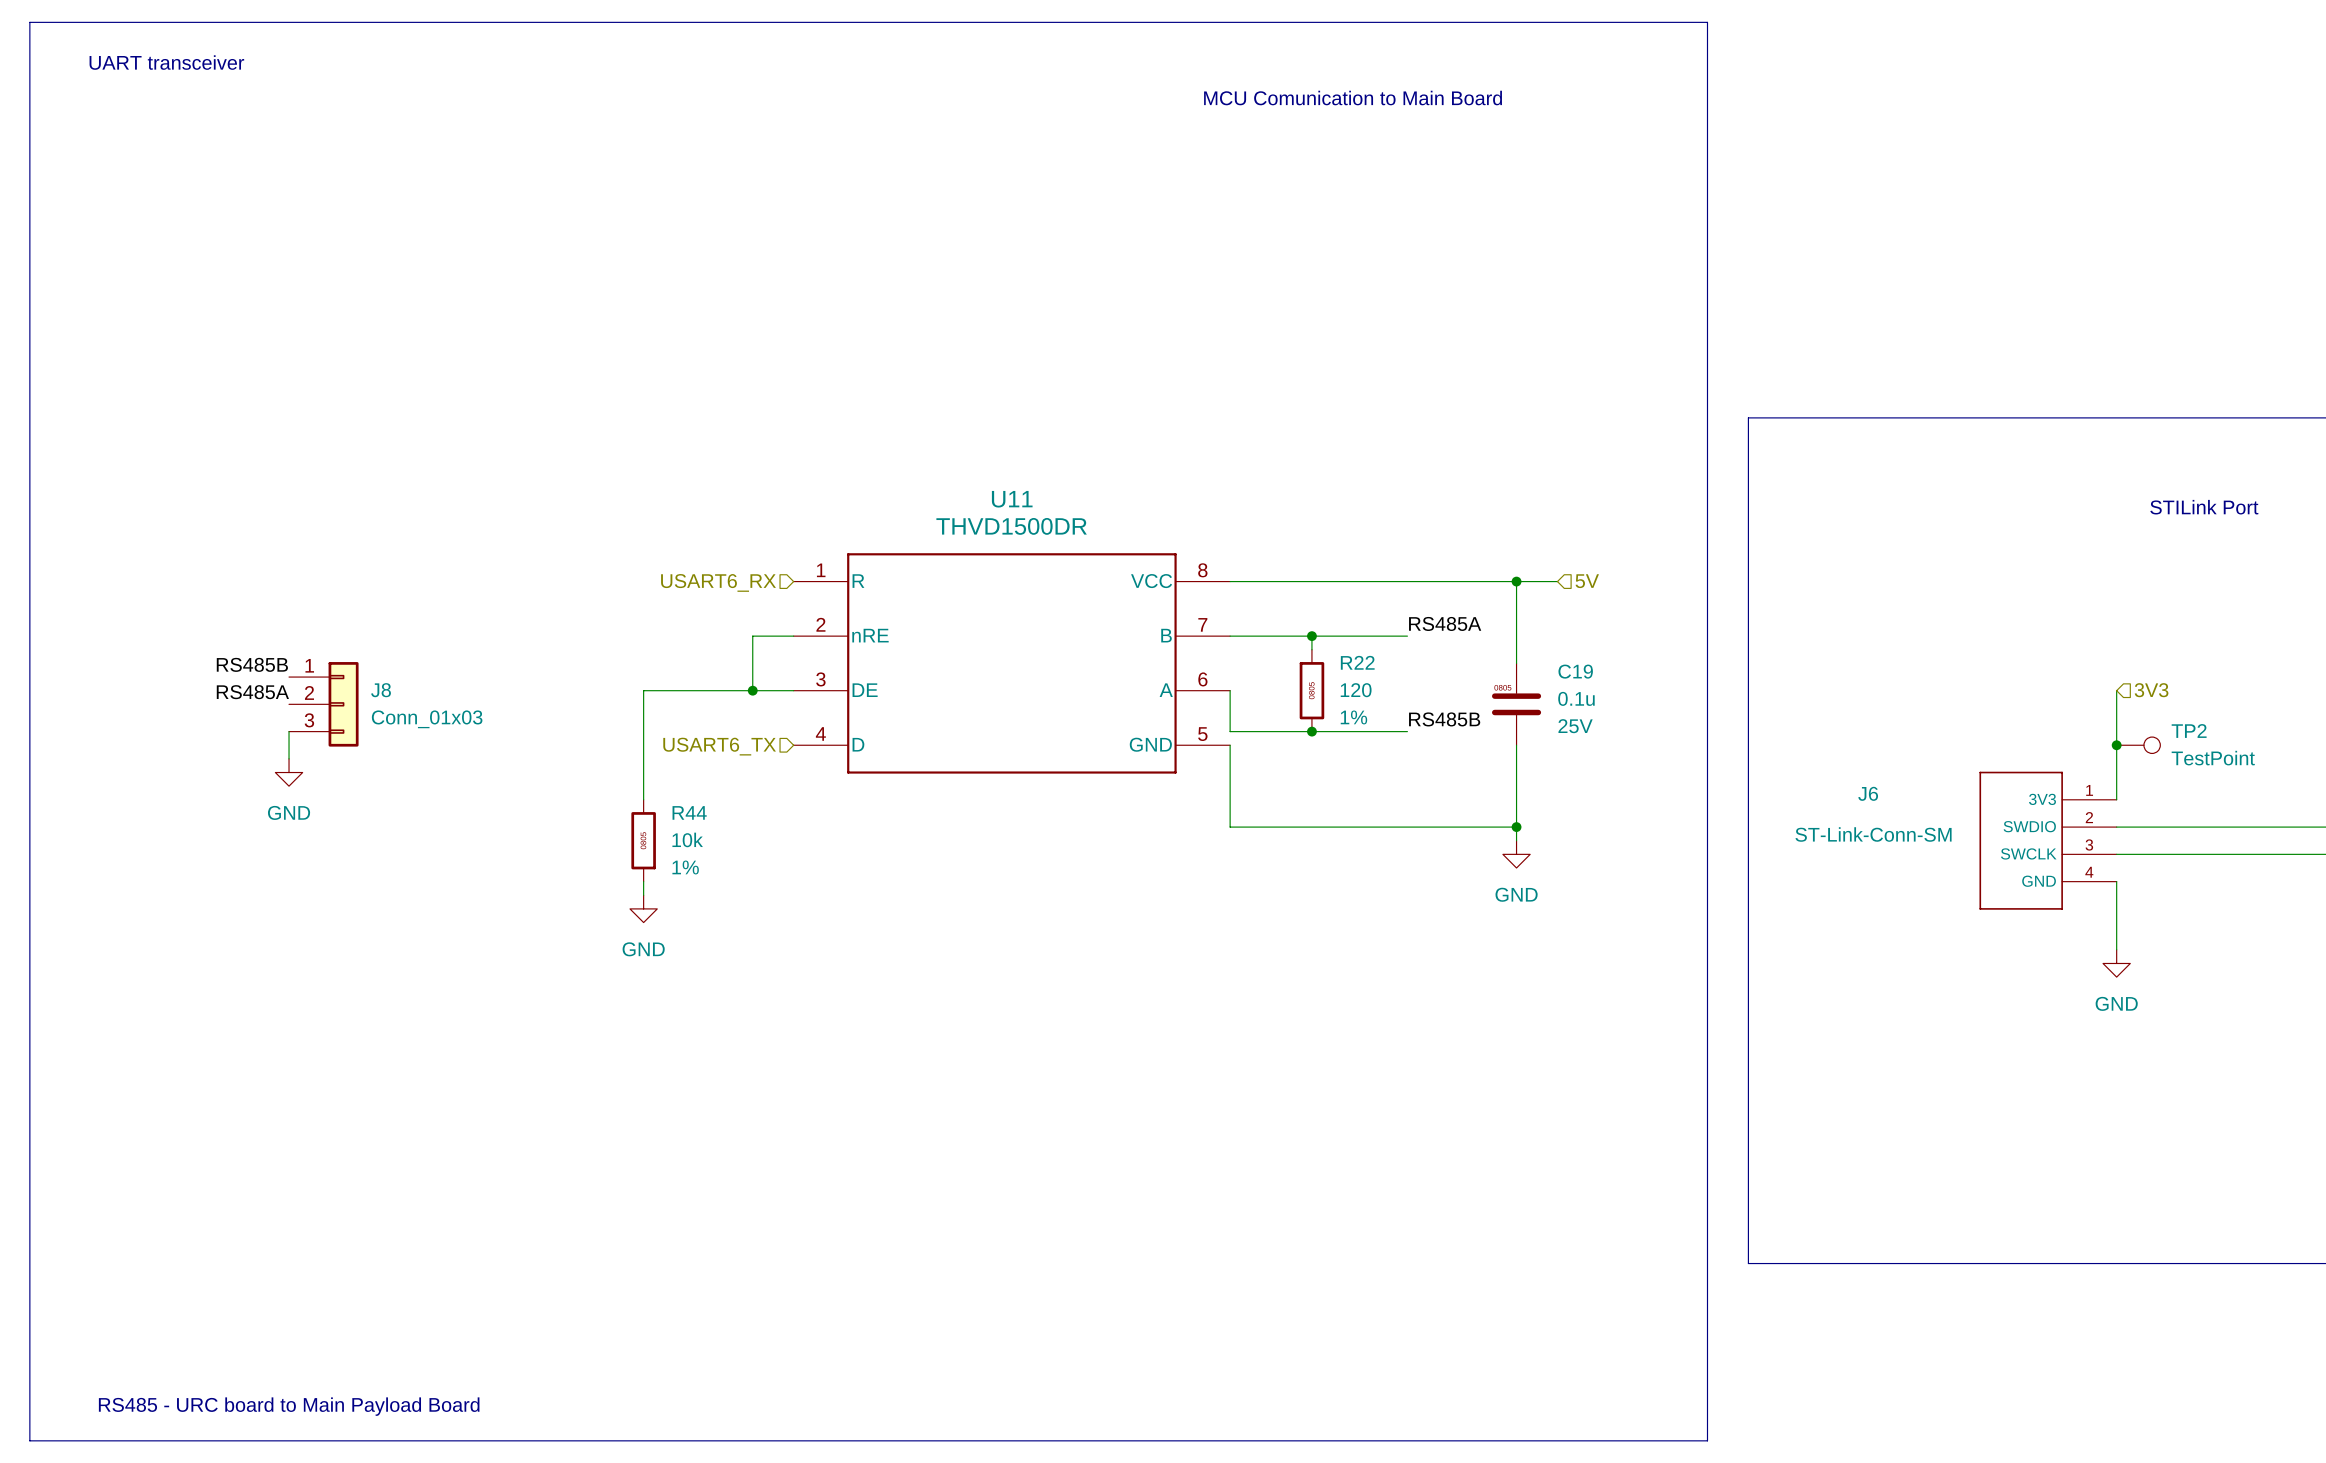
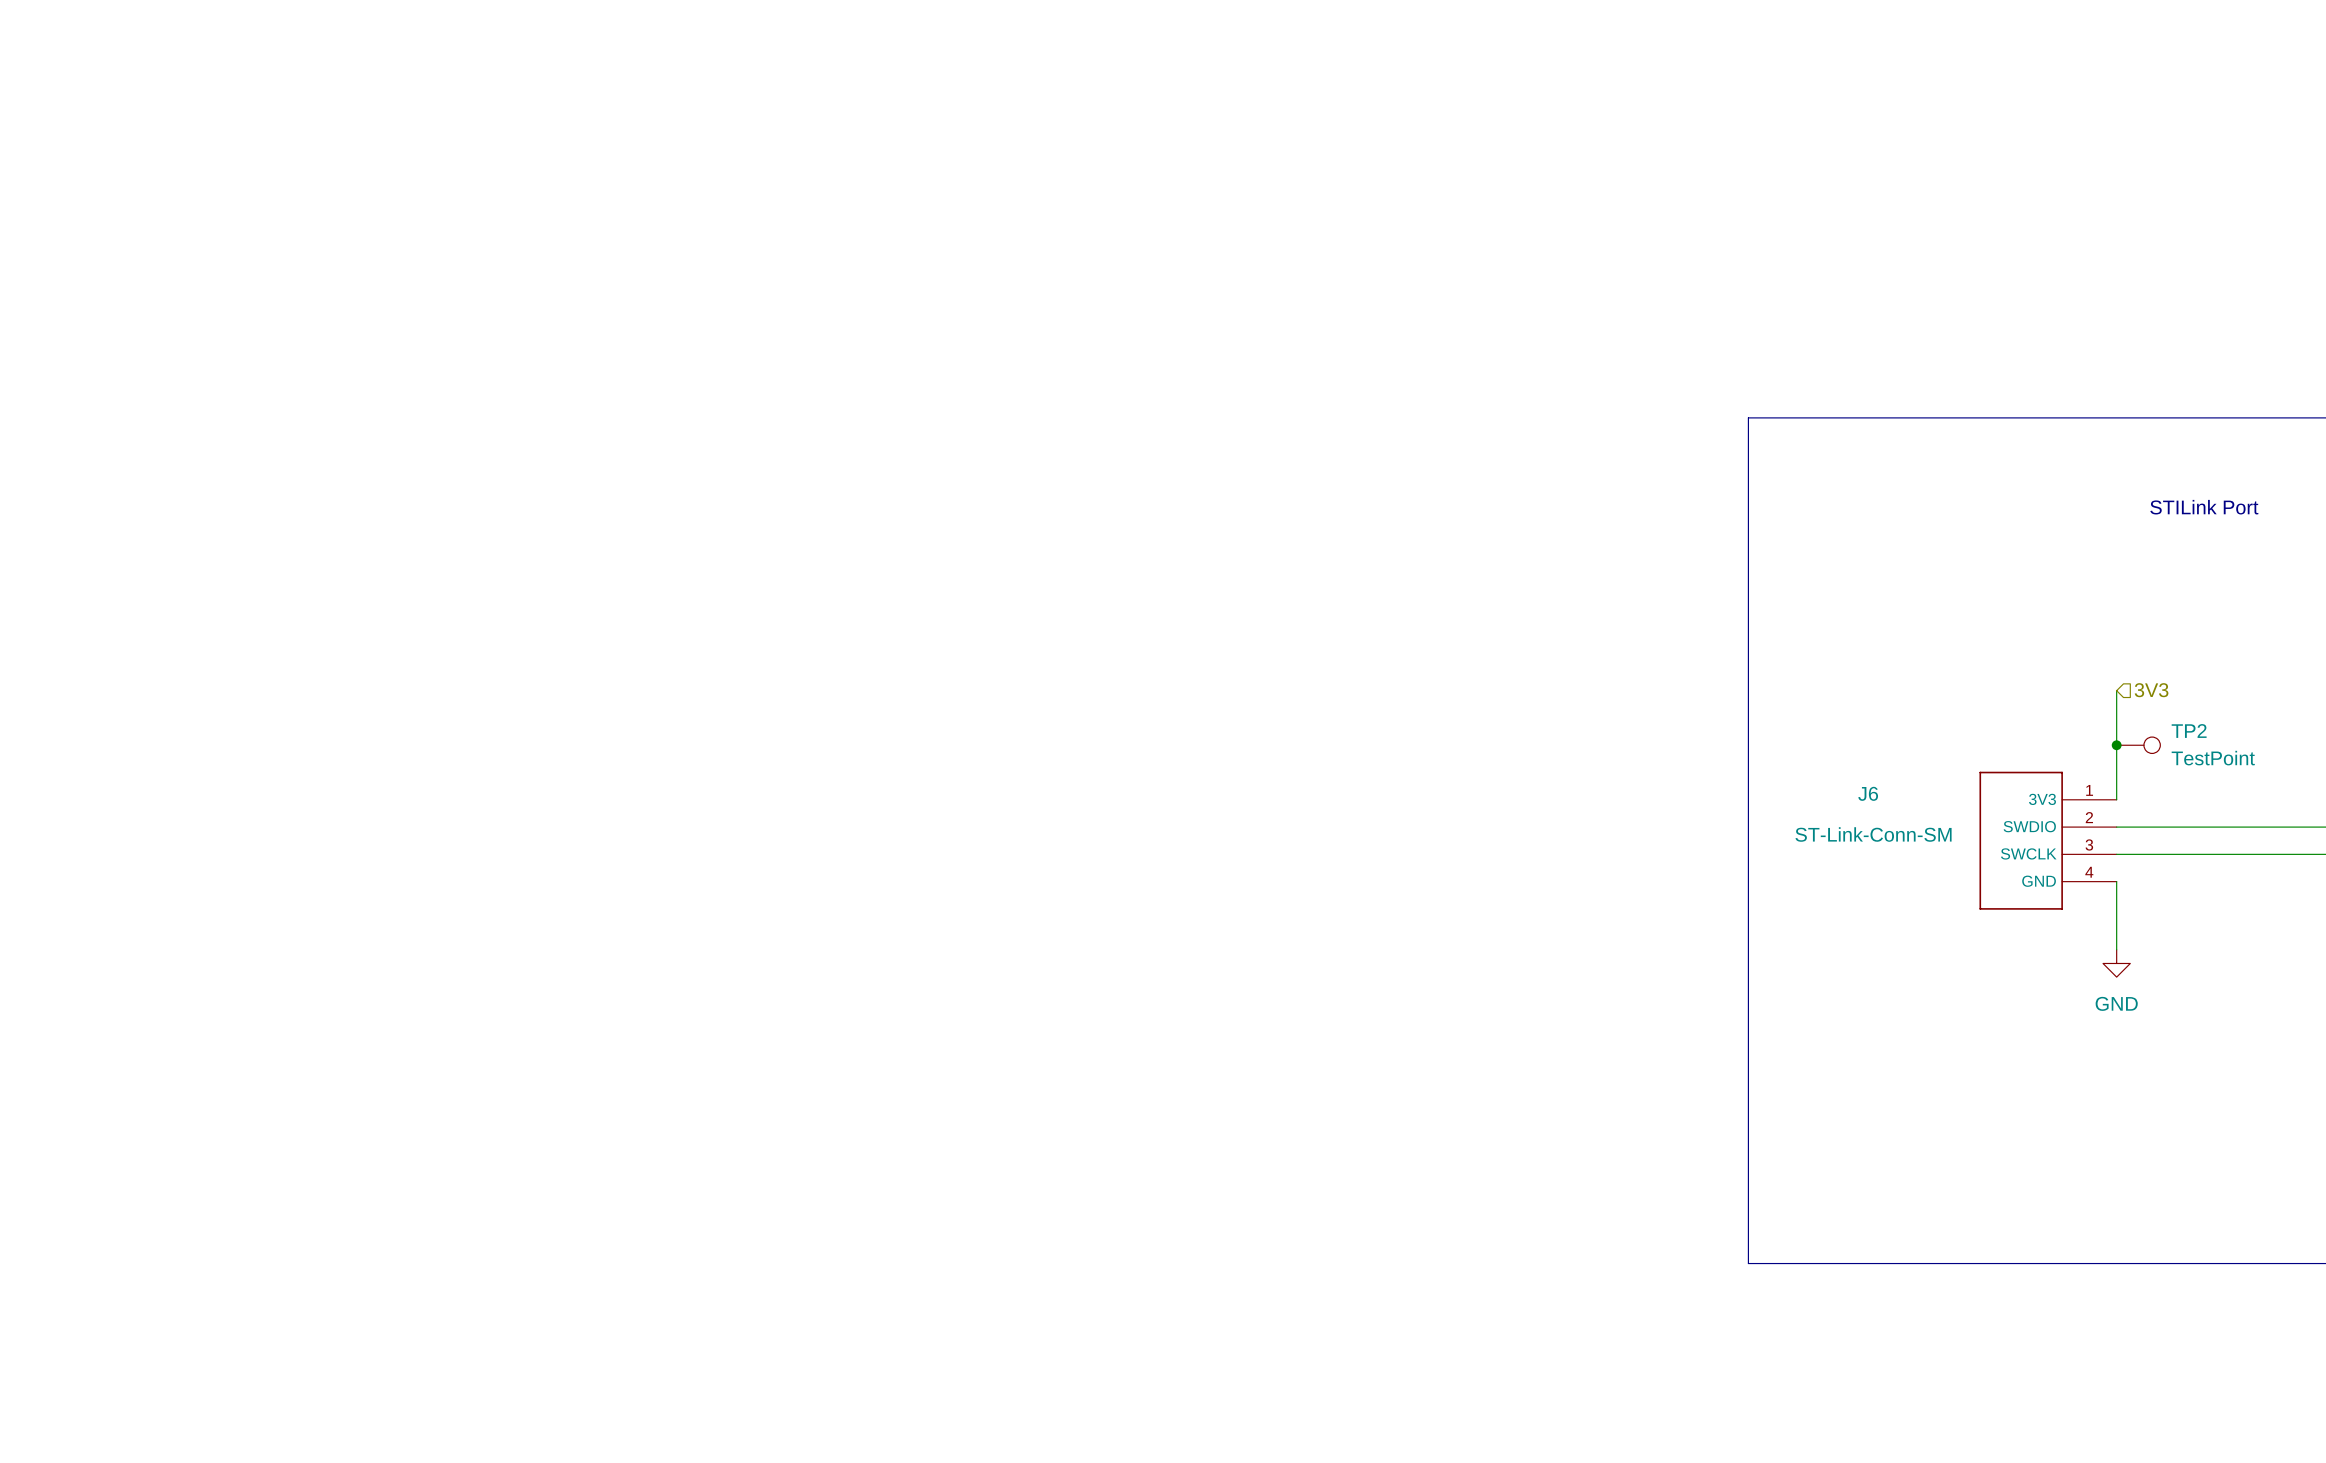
line: (29, 22) (1707, 22) (1707, 1440) (29, 1440) (29, 22) -> none
text: UART transceiver (166, 62) -> none
text: MCU Comunication to Main Board (1353, 98) -> none
wire: (1230, 581) (1557, 581) -> none
wire: (1516, 581) (1516, 663) -> none
junction: (1516, 581) -> none
hierarchical label: 5V (1587, 581) -> none
hierarchical label: USART6_RX (718, 582) -> none
label: RS485A (1445, 623) -> none
wire: (793, 636) (752, 636) (752, 690) -> none
wire: (1230, 636) (1407, 636) -> none
wire: (1311, 636) (1311, 649) -> none
junction: (1311, 636) -> none
U11: THVD1500DR (1011, 663) -> none
label: RS485B (252, 664) -> none
junction: (752, 690) -> none
wire: (793, 690) (643, 690) (643, 799) -> none
wire: (1230, 690) (1230, 731) (1407, 731) -> none
R22: 120 (1311, 690) -> none
label: RS485A (252, 692) -> none
J8: Conn_01x03 (323, 704) -> none
C19: 0.1u (1516, 704) -> none
label: RS485B (1444, 719) -> none
wire: (289, 731) (289, 758) -> none
junction: (1311, 731) -> none
wire: (1230, 745) (1230, 827) (1516, 827) -> none
wire: (1516, 745) (1516, 840) -> none
hierarchical label: USART6_TX (719, 746) -> none
power symbol: GND (289, 772) -> none
junction: (1516, 827) -> none
R44: 10k (643, 840) -> none
power symbol: GND (1516, 854) -> none
wire: (643, 881) (643, 895) -> none
power symbol: GND (643, 908) -> none
text: RS485 - URC board to Main Payload Board (289, 1406) -> none

